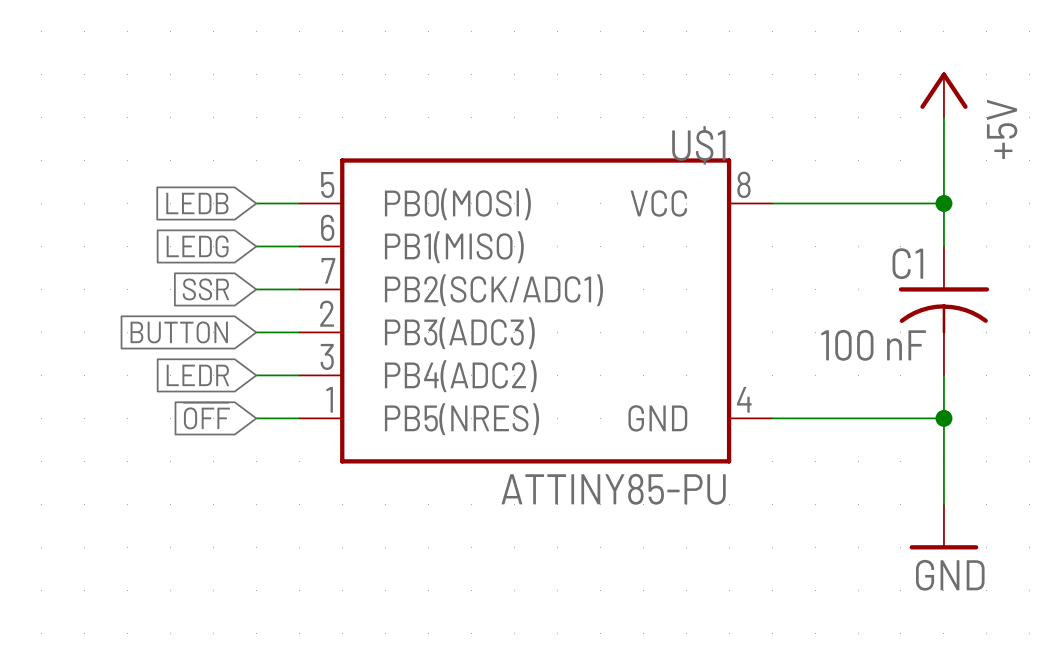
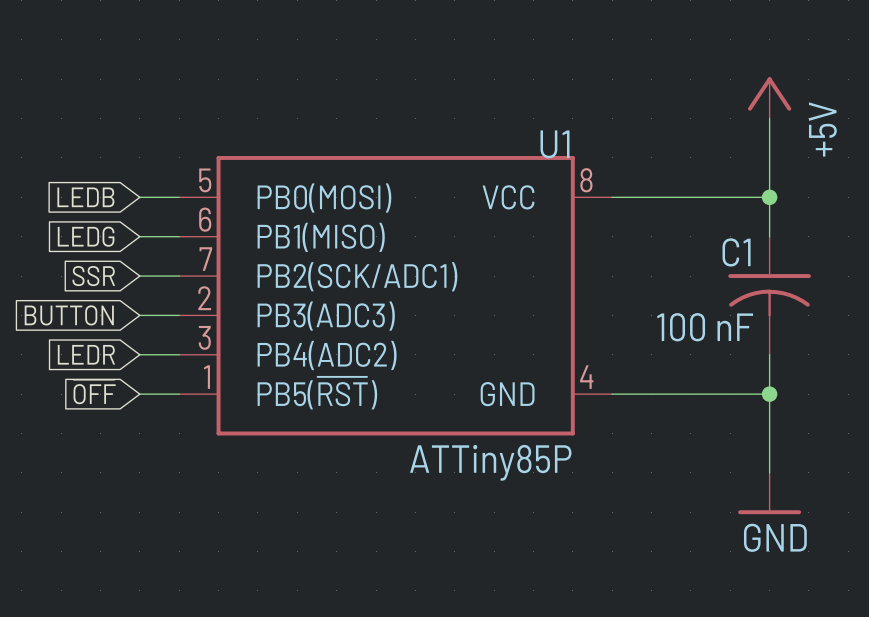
U$1 name: U$1 (698, 145) -> U1 (555, 144)
U$1 pin name: PB5(NRES) (461, 419) -> PB5(~{RST}) (317, 393)
U$1 value: ATTINY85-PU (613, 489) -> ATTiny85P (490, 462)

